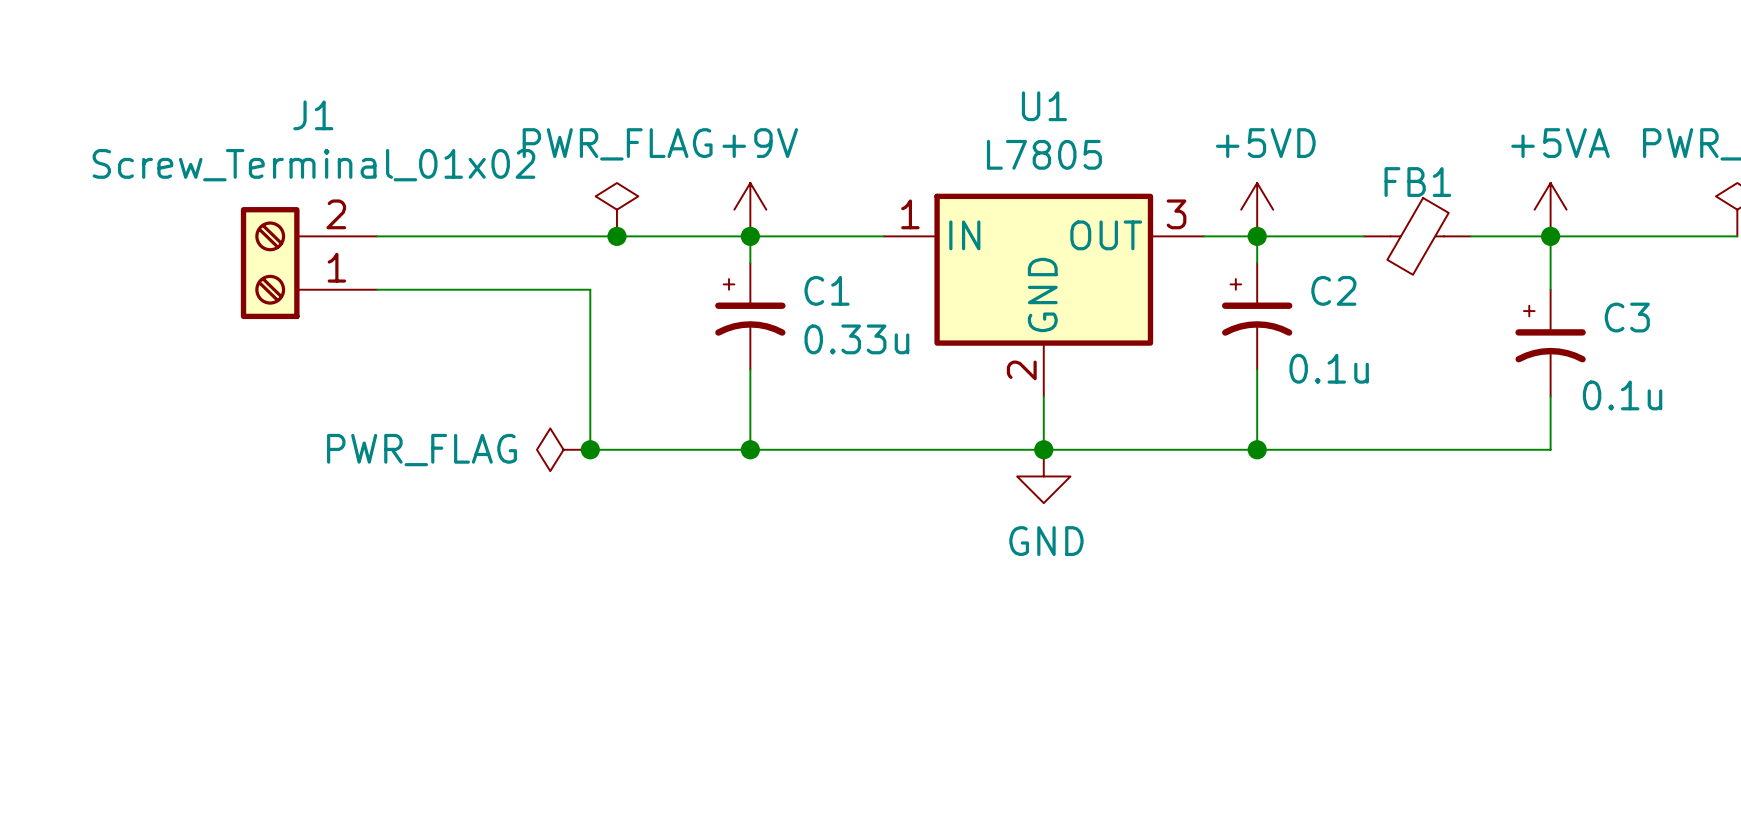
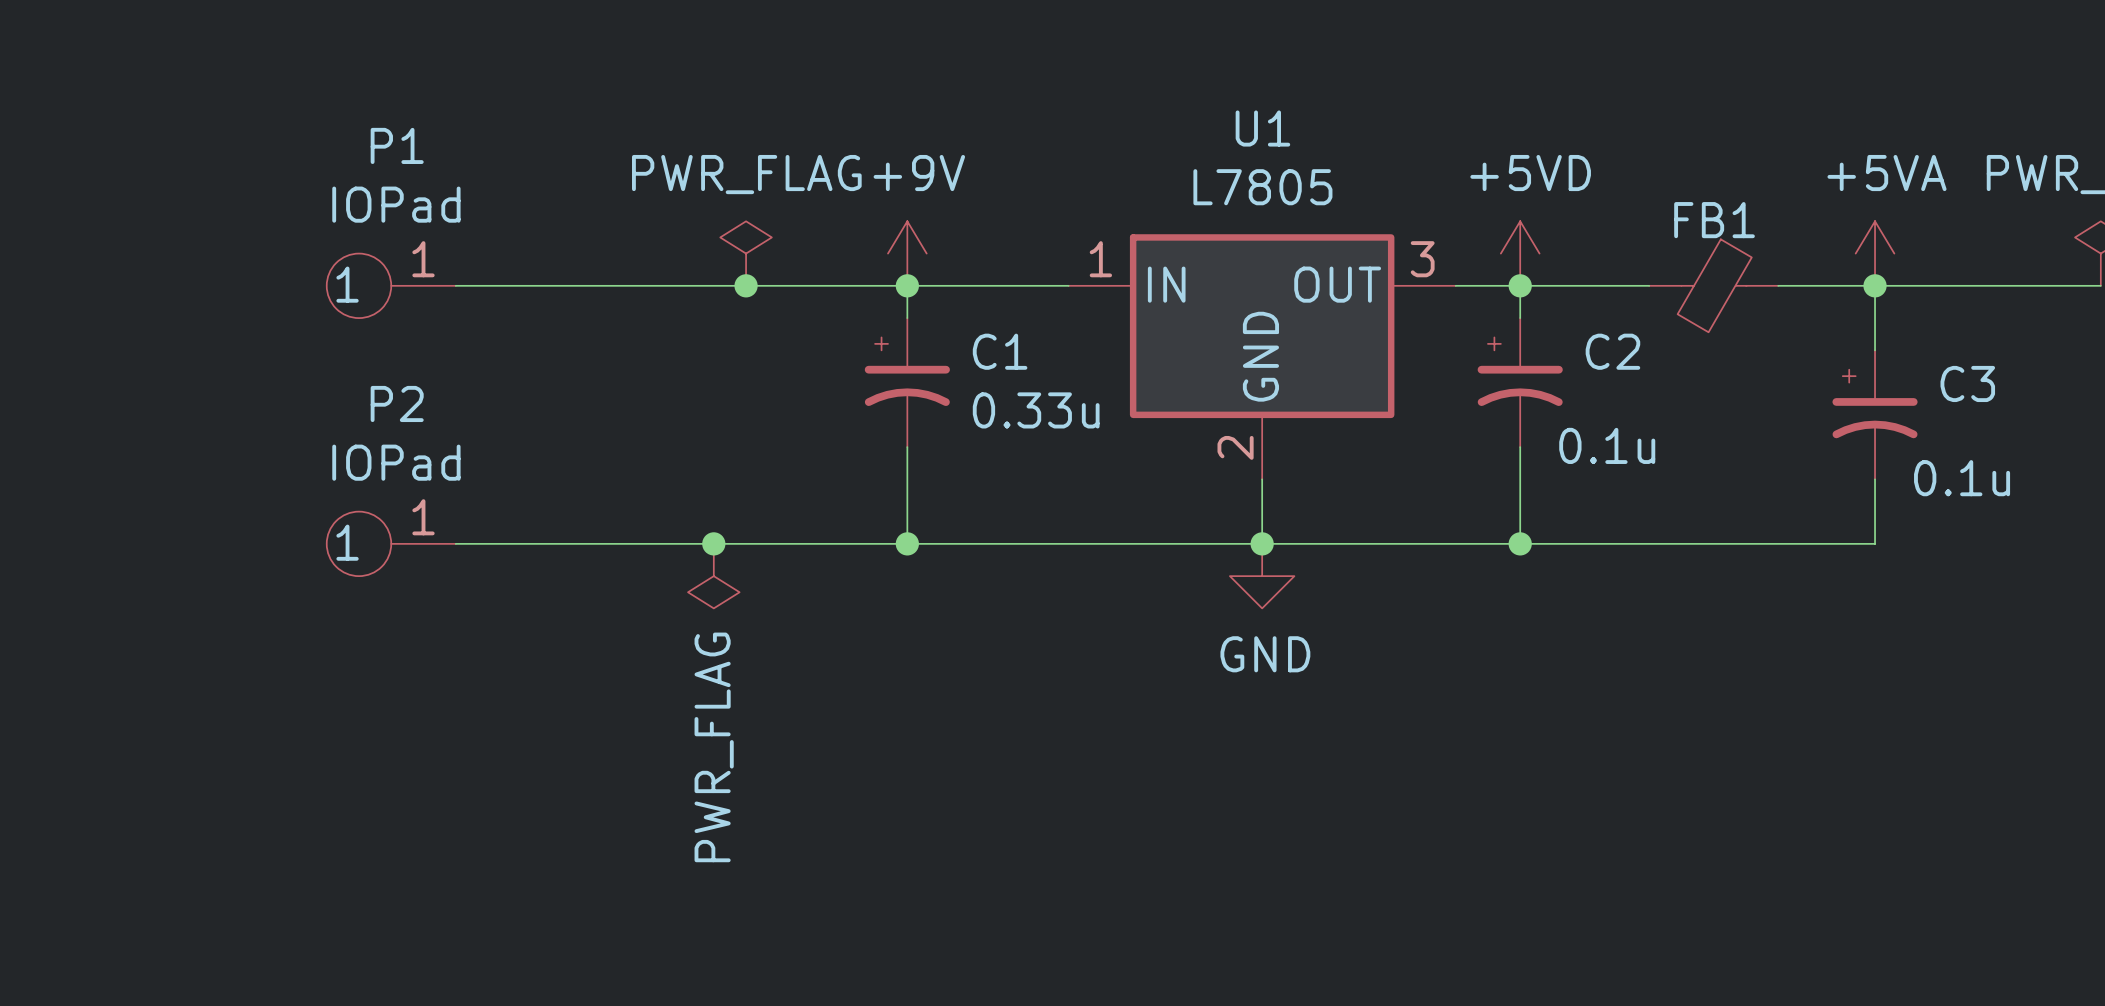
P1: none -> IOPad (391, 285)
J1: Screw_Terminal_01x02 (308, 263) -> none
wire: (376, 289) (590, 289) (590, 449) -> (455, 543) (713, 543)
P2: none -> IOPad (391, 543)
power symbol rotation: 0° (563, 449) -> 90° counterclockwise (713, 576)
power symbol position: PWR_FLAG (563, 449) -> PWR_FLAG (713, 576)

